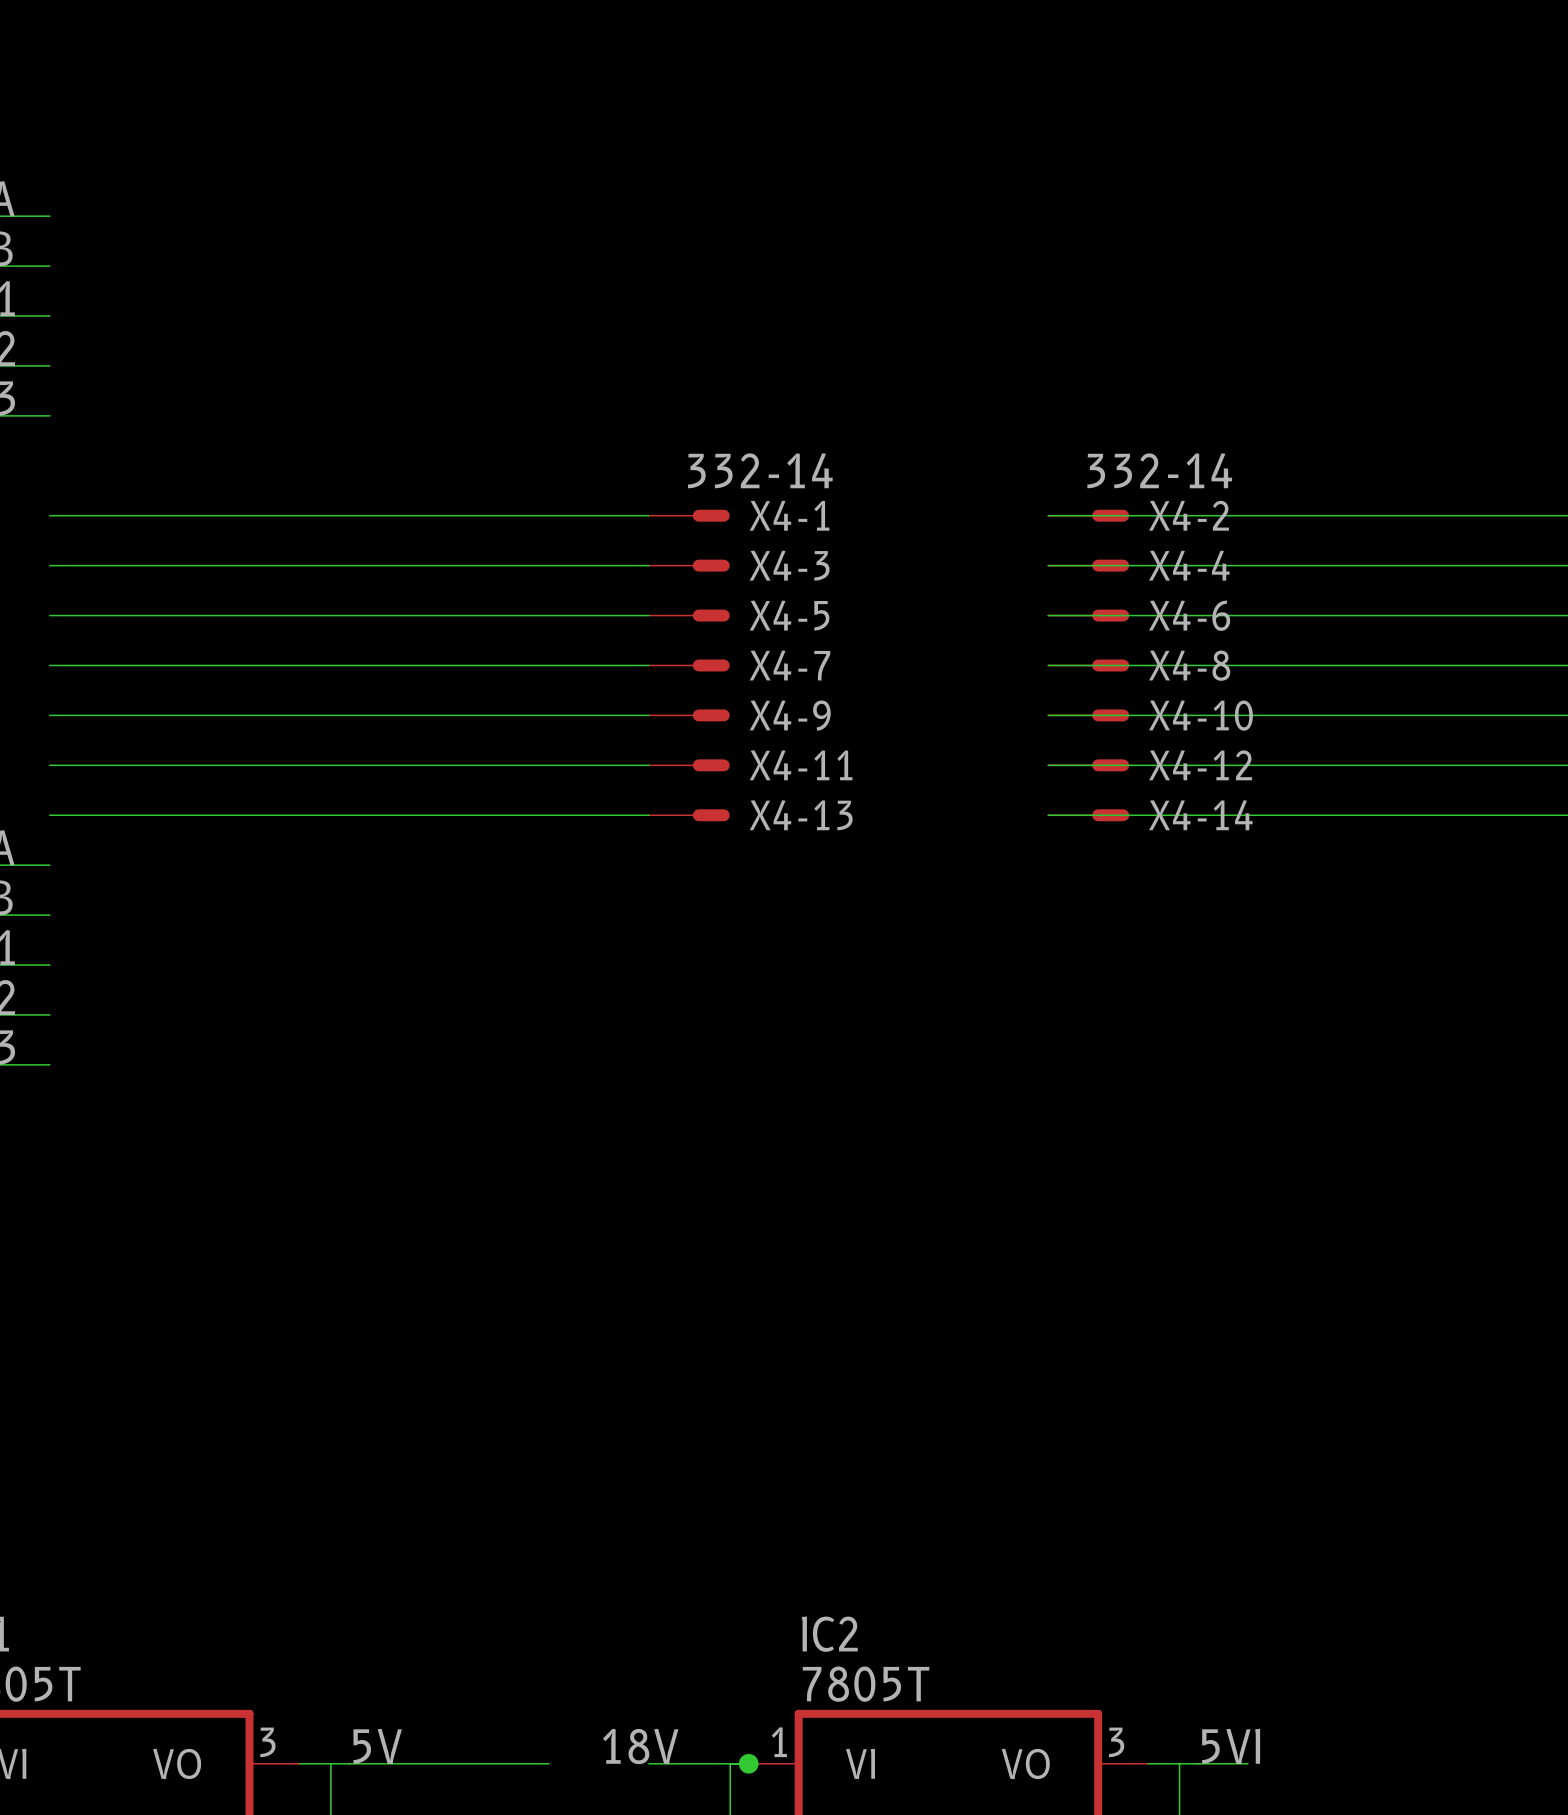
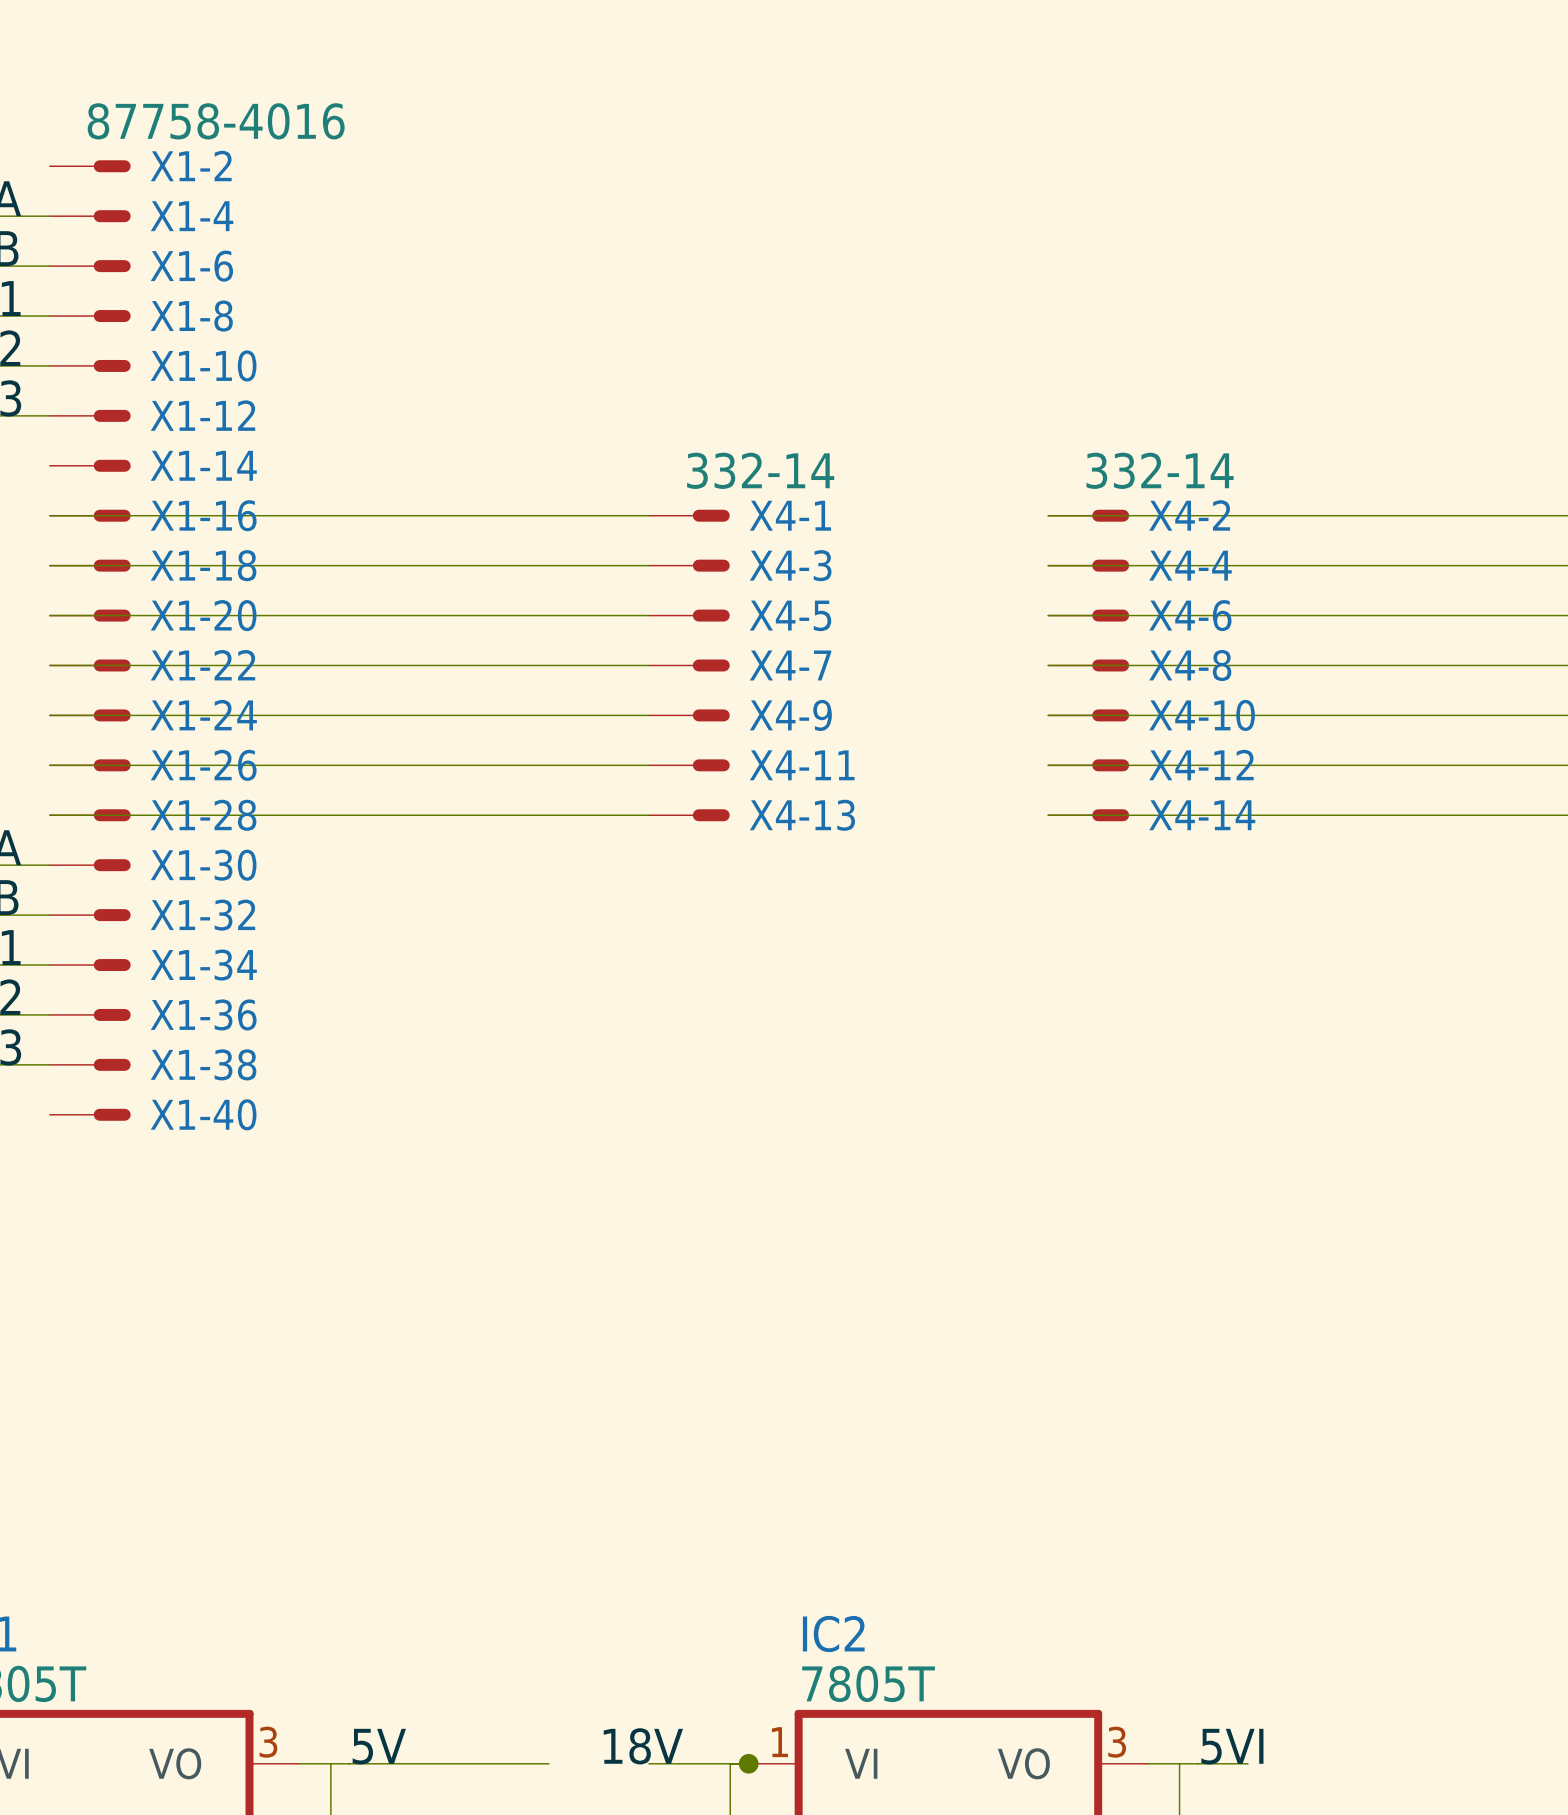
X1-2: none -> 87758-4016 (90, 166)
X1-4: none -> (90, 216)
X1-6: none -> (90, 266)
X1-8: none -> (90, 316)
X1-10: none -> (90, 365)
X1-12: none -> (90, 415)
X1-14: none -> (90, 465)
X1-16: none -> (90, 515)
X1-18: none -> (90, 565)
X1-20: none -> (90, 615)
X1-22: none -> (90, 665)
X1-24: none -> (90, 715)
X1-26: none -> (90, 765)
X1-28: none -> (90, 815)
X1-30: none -> (90, 865)
X1-32: none -> (90, 915)
X1-34: none -> (90, 965)
X1-36: none -> (90, 1014)
X1-38: none -> (90, 1064)
X1-40: none -> (90, 1114)

